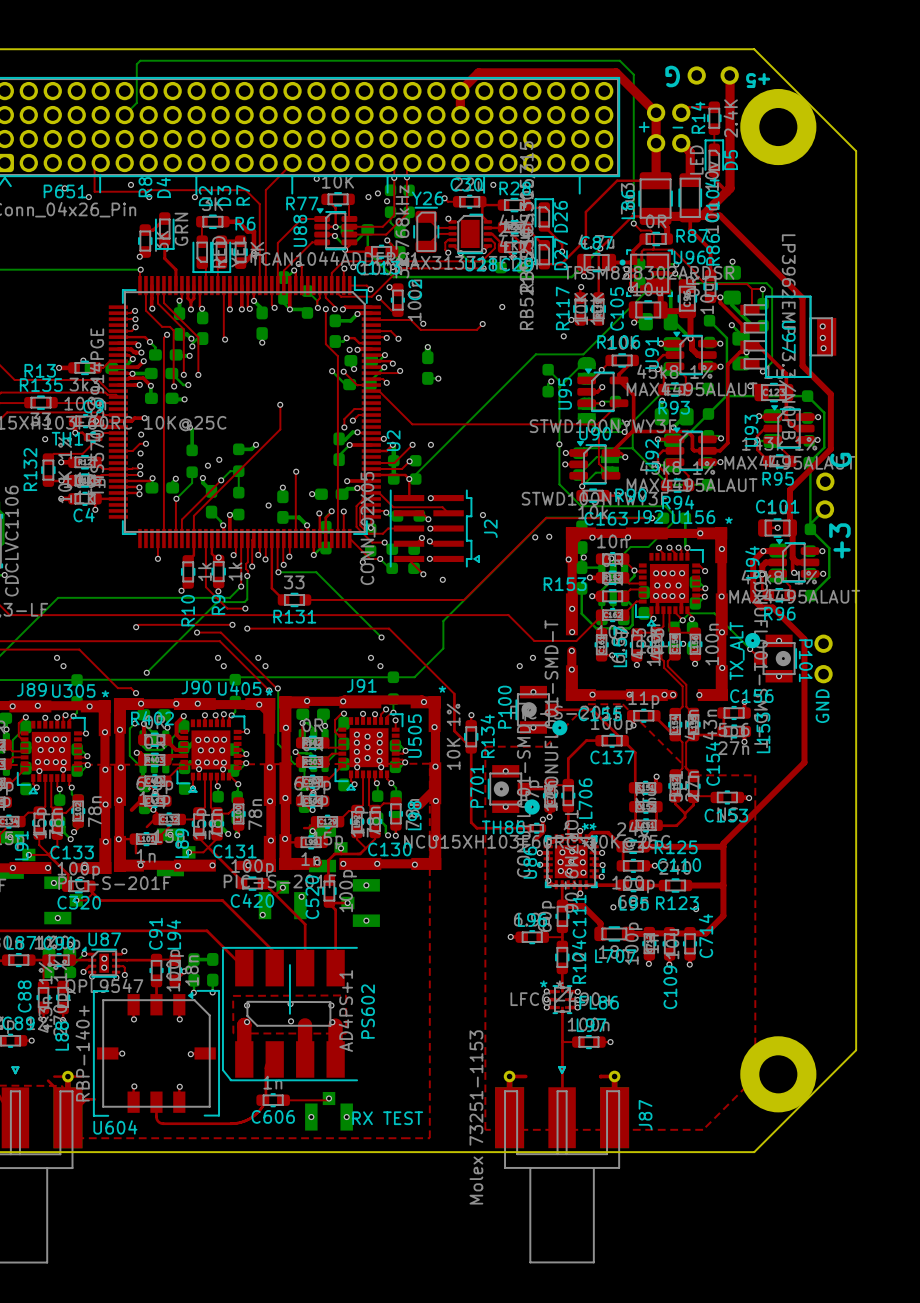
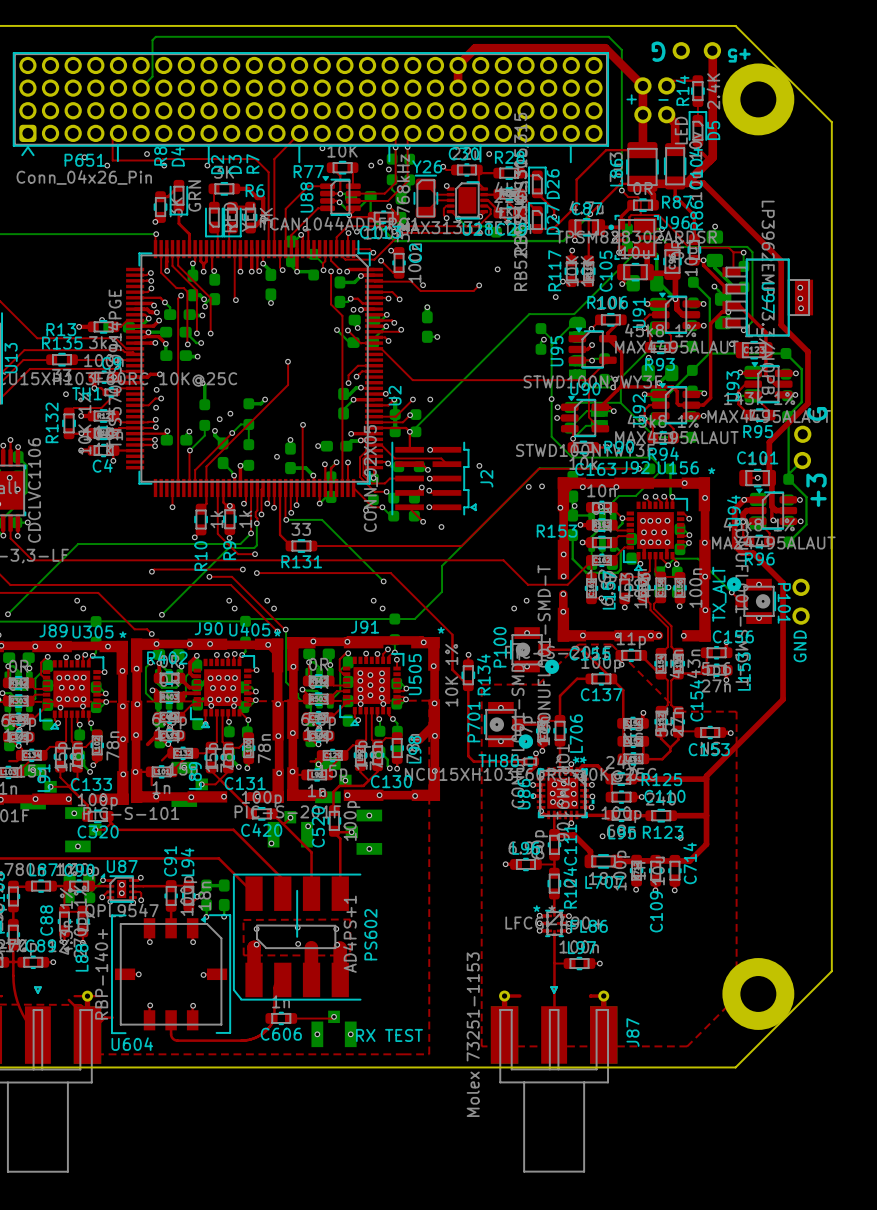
J90 value: PIC-S-201F (114, 883) -> PIC-S-101 (131, 813)

